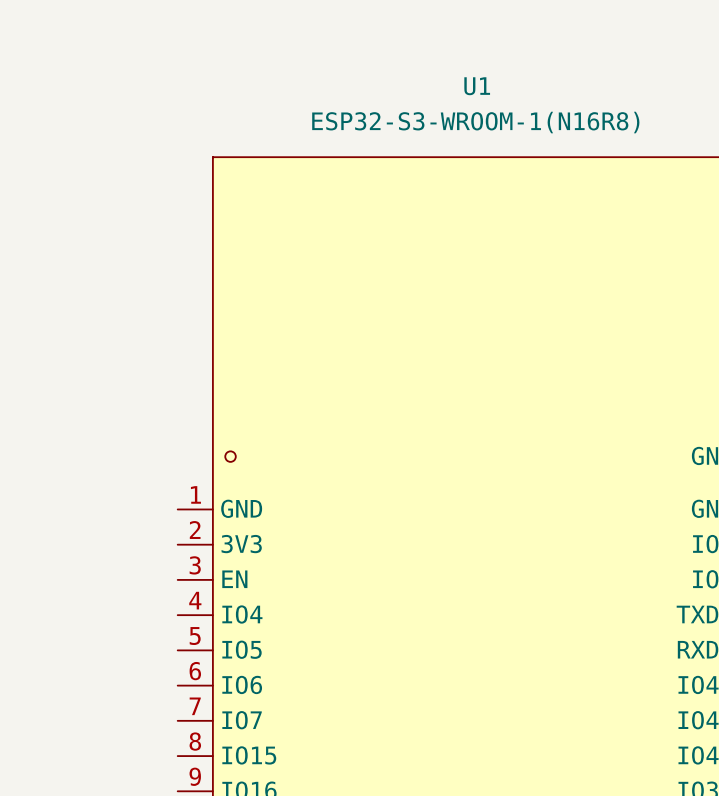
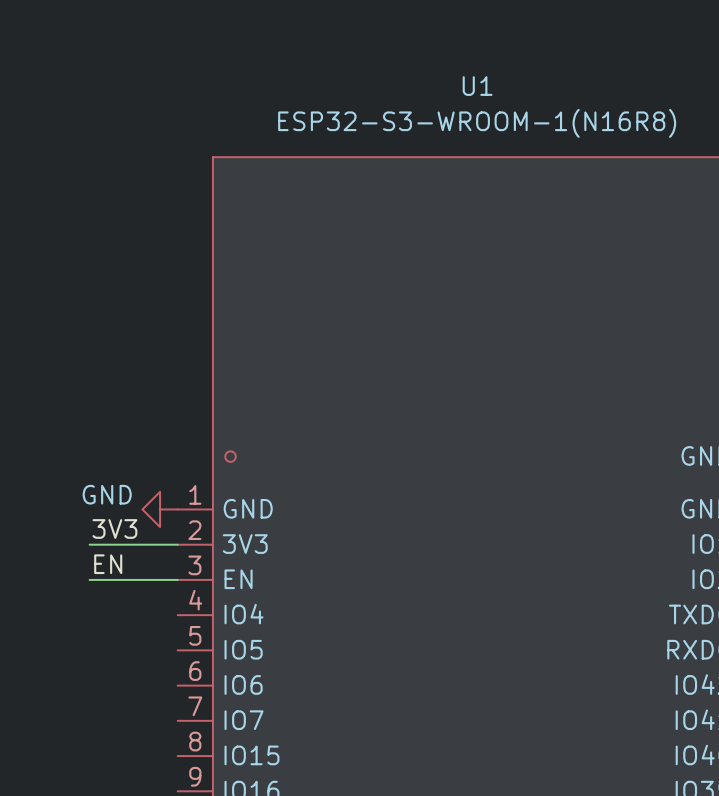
power symbol: none -> GND (160, 509)
label: none -> 3V3 (114, 528)
wire: none -> (89, 544) (177, 544)
label: none -> EN (108, 564)
wire: none -> (89, 579) (177, 579)

